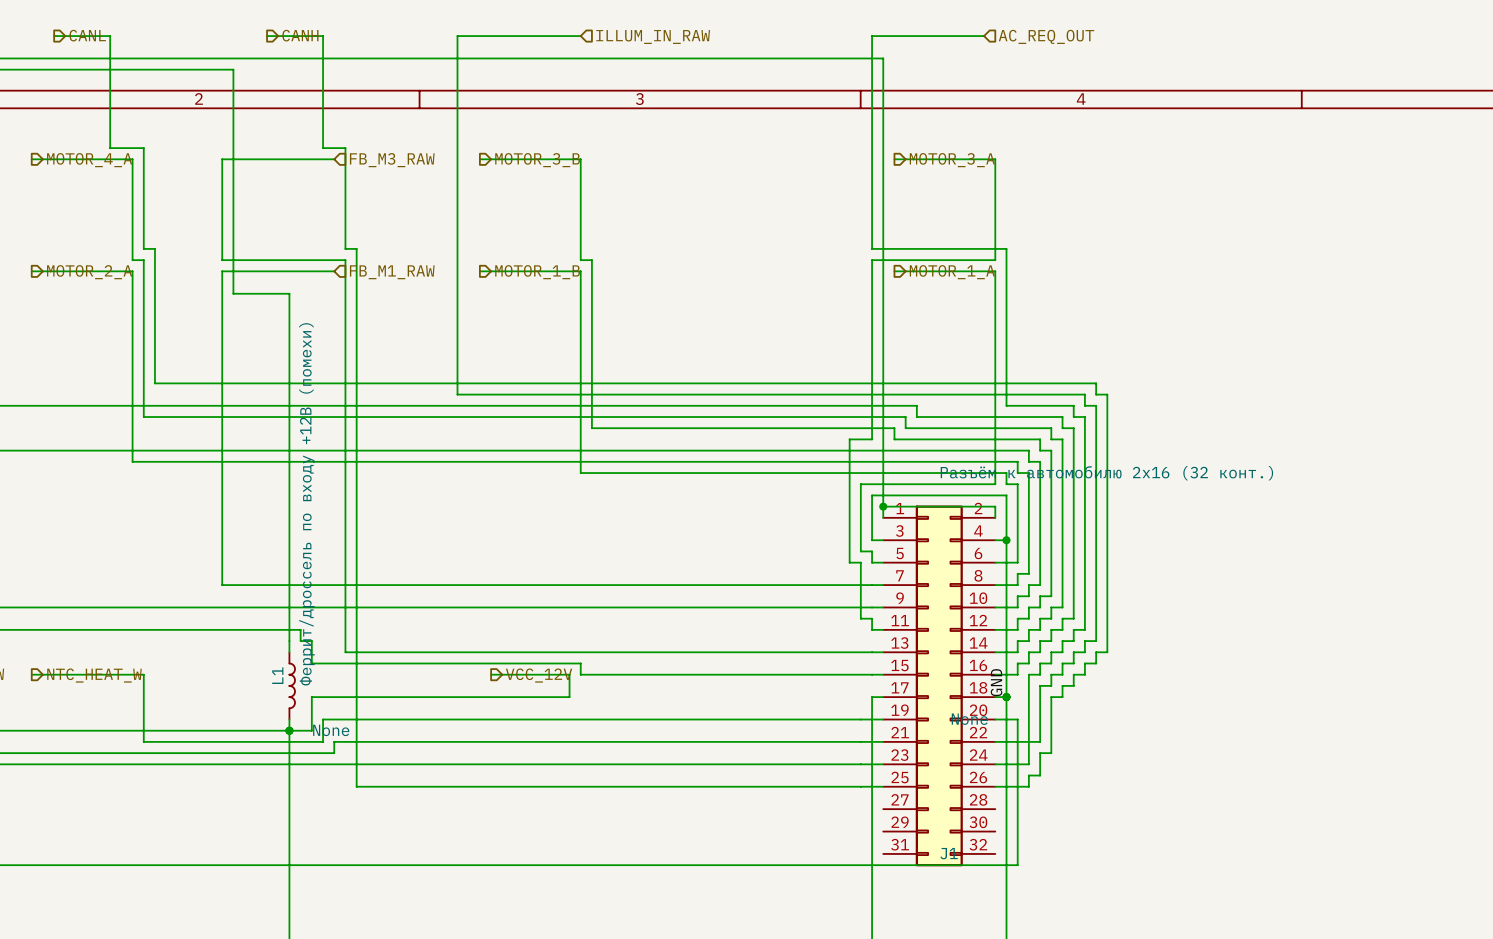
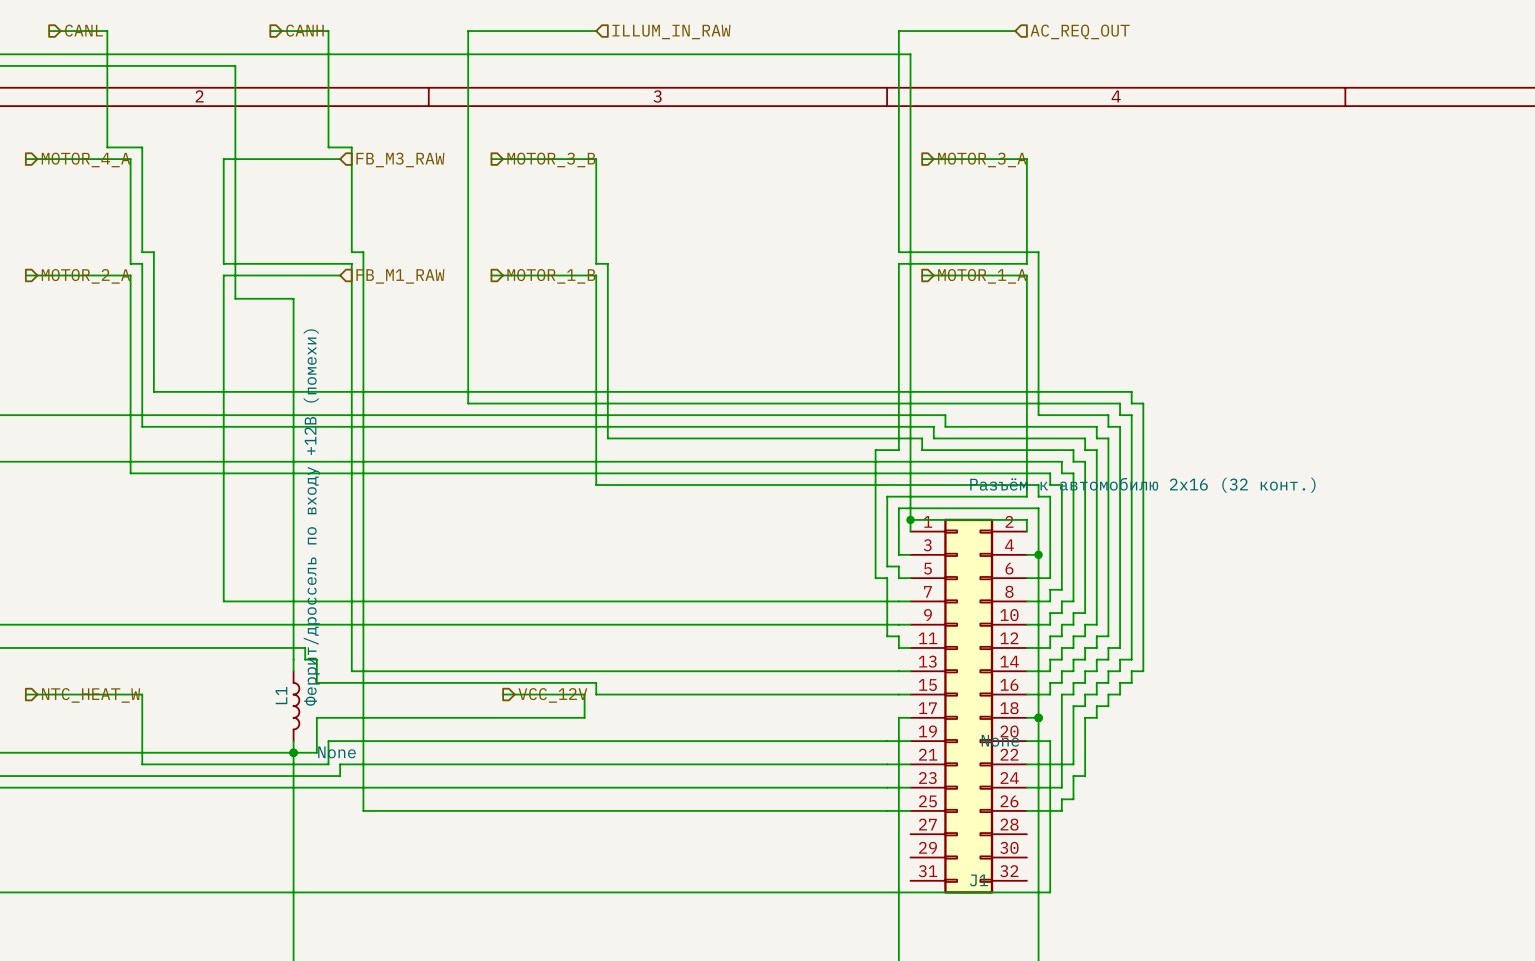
label: GND (996, 682) -> none

